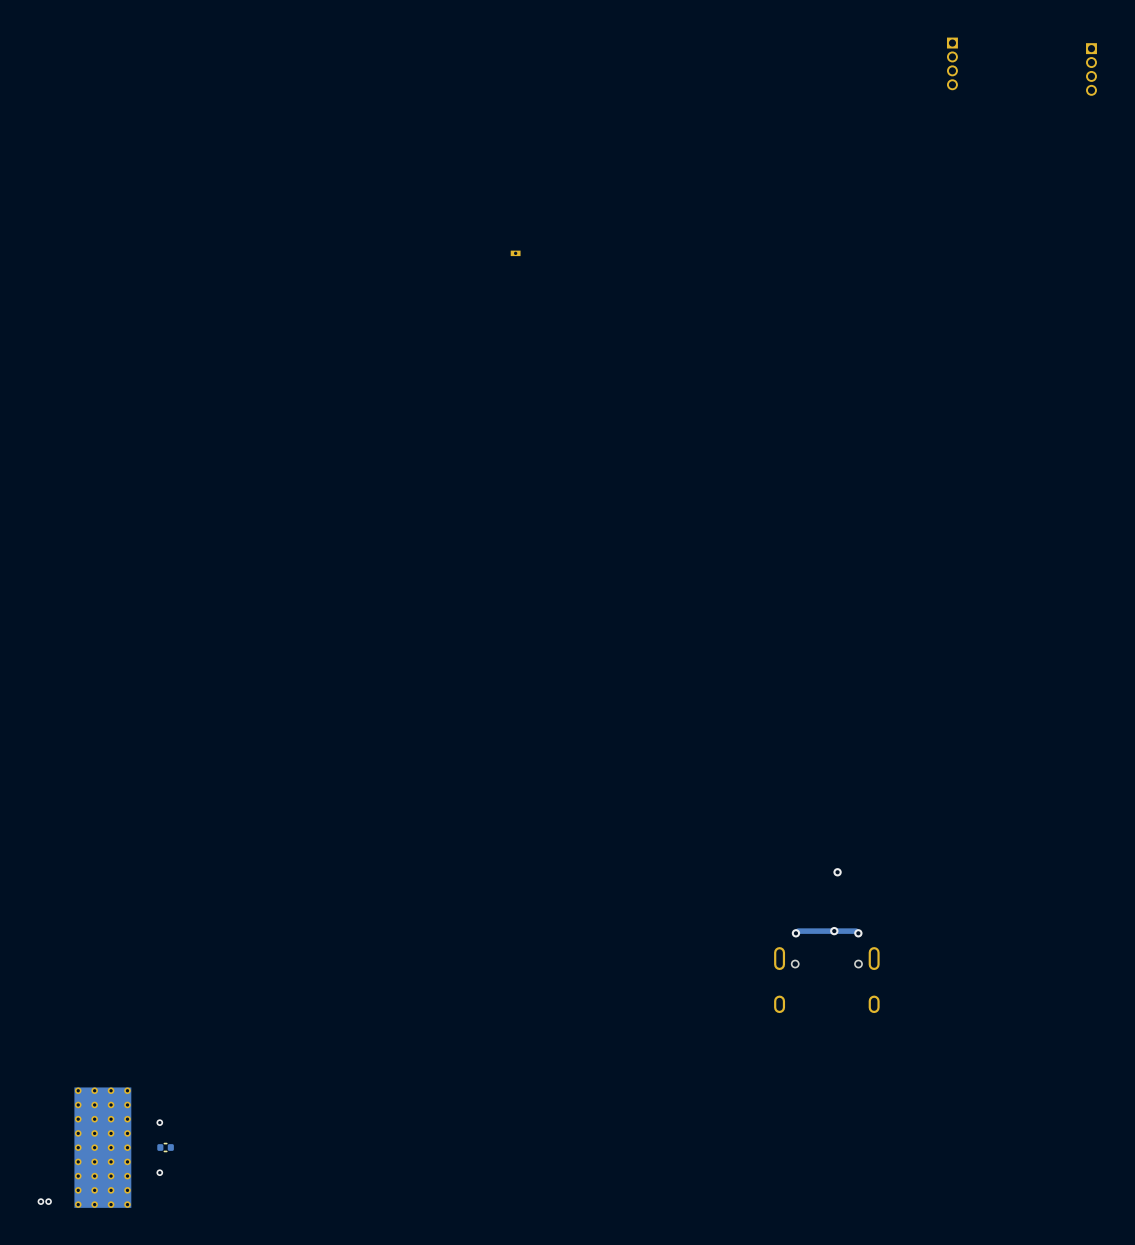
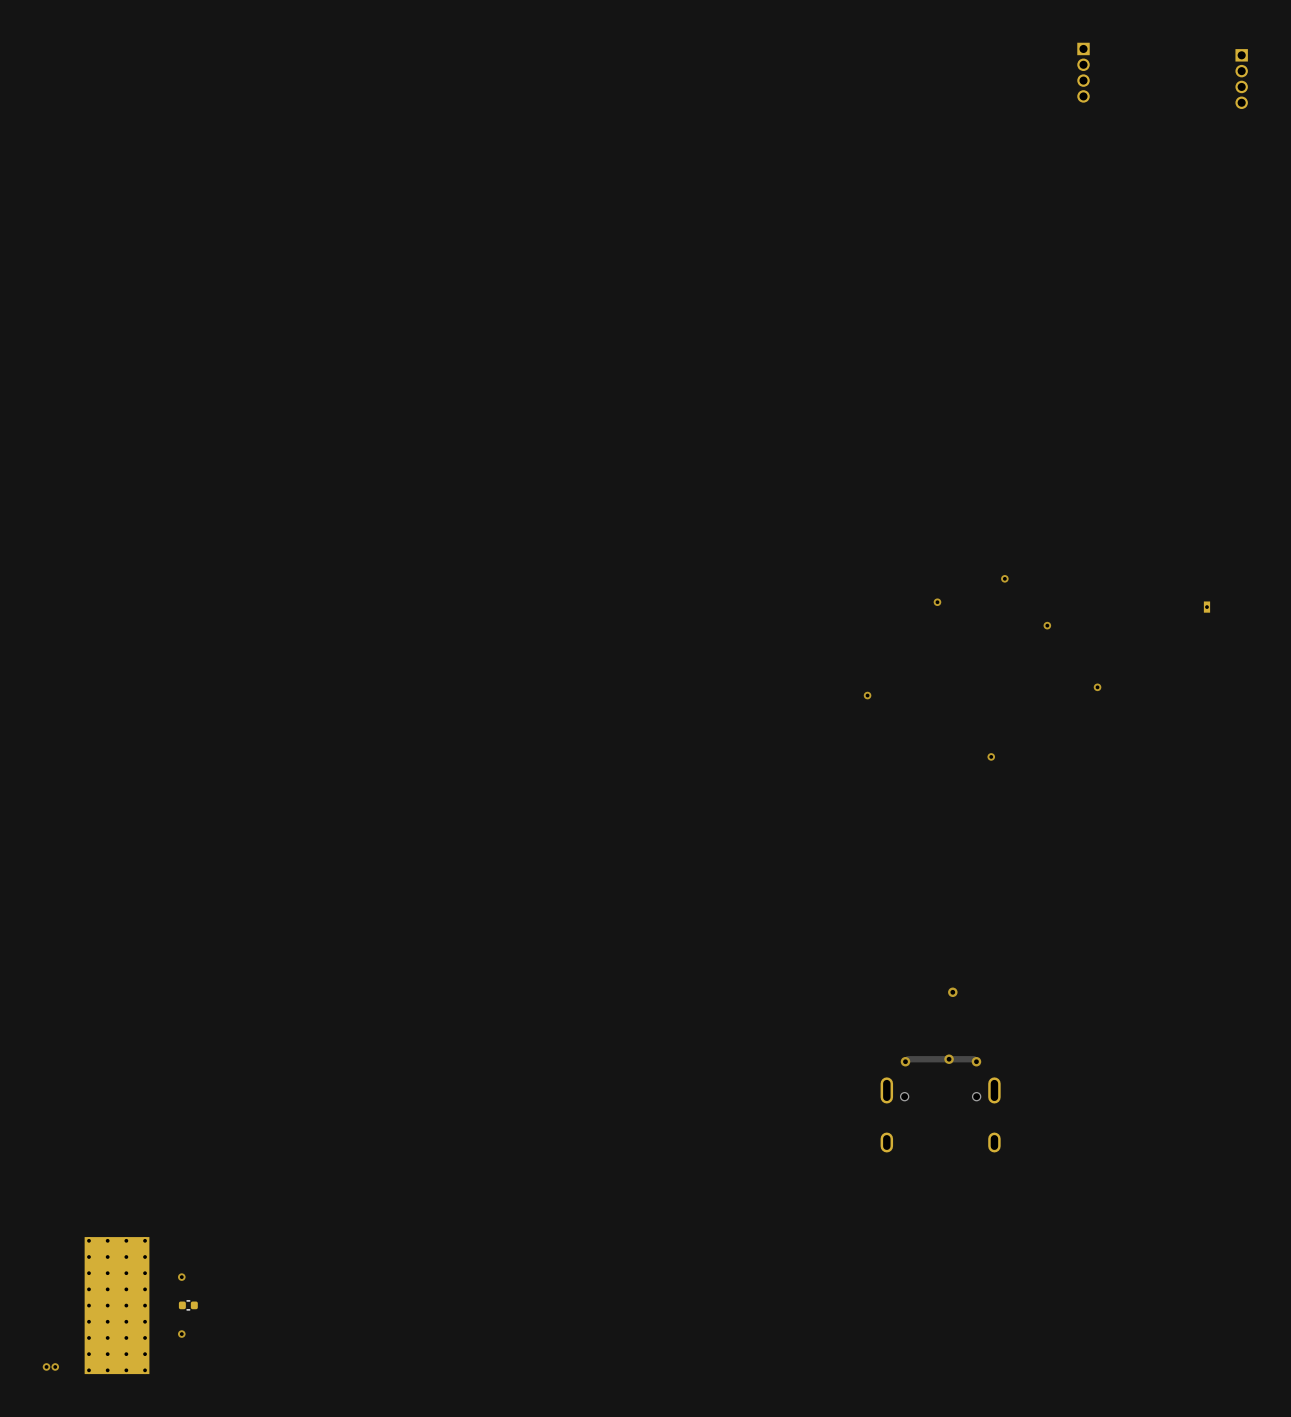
part: (515, 253) -> none
via: none -> (1004, 578)
via: none -> (937, 602)
part: none -> (1206, 607)
via: none -> (1047, 625)
via: none -> (1097, 687)
via: none -> (867, 695)
via: none -> (991, 756)

